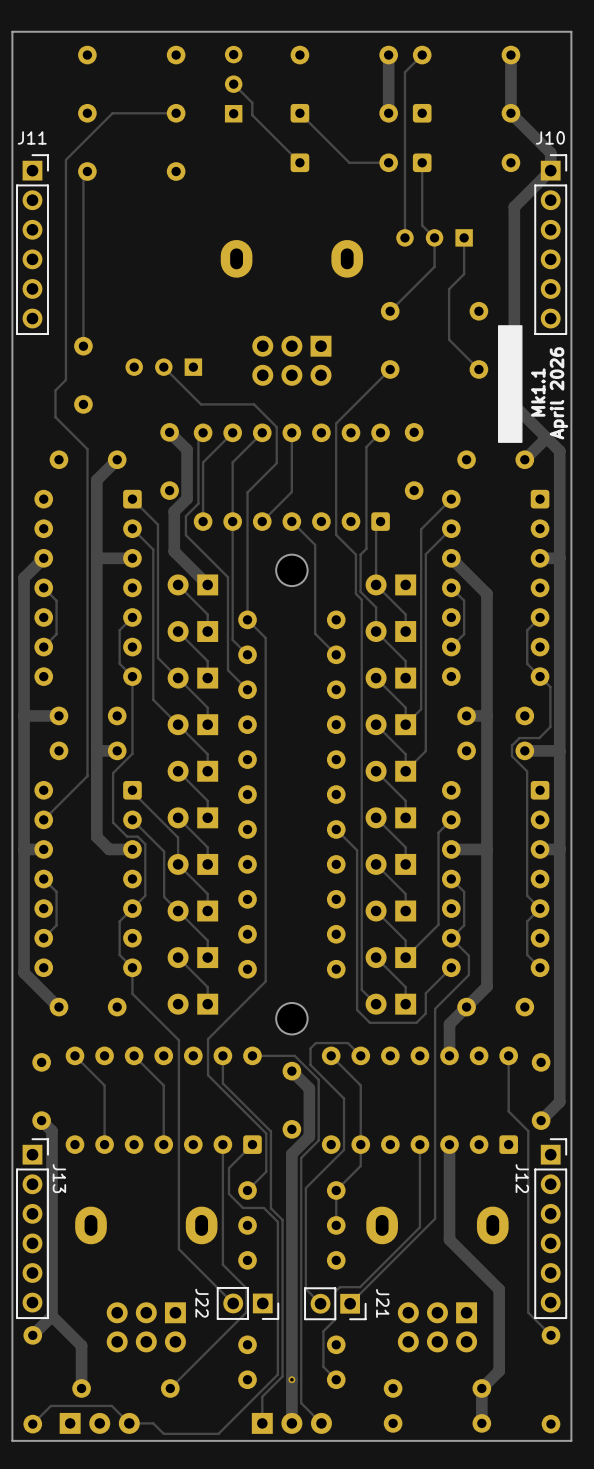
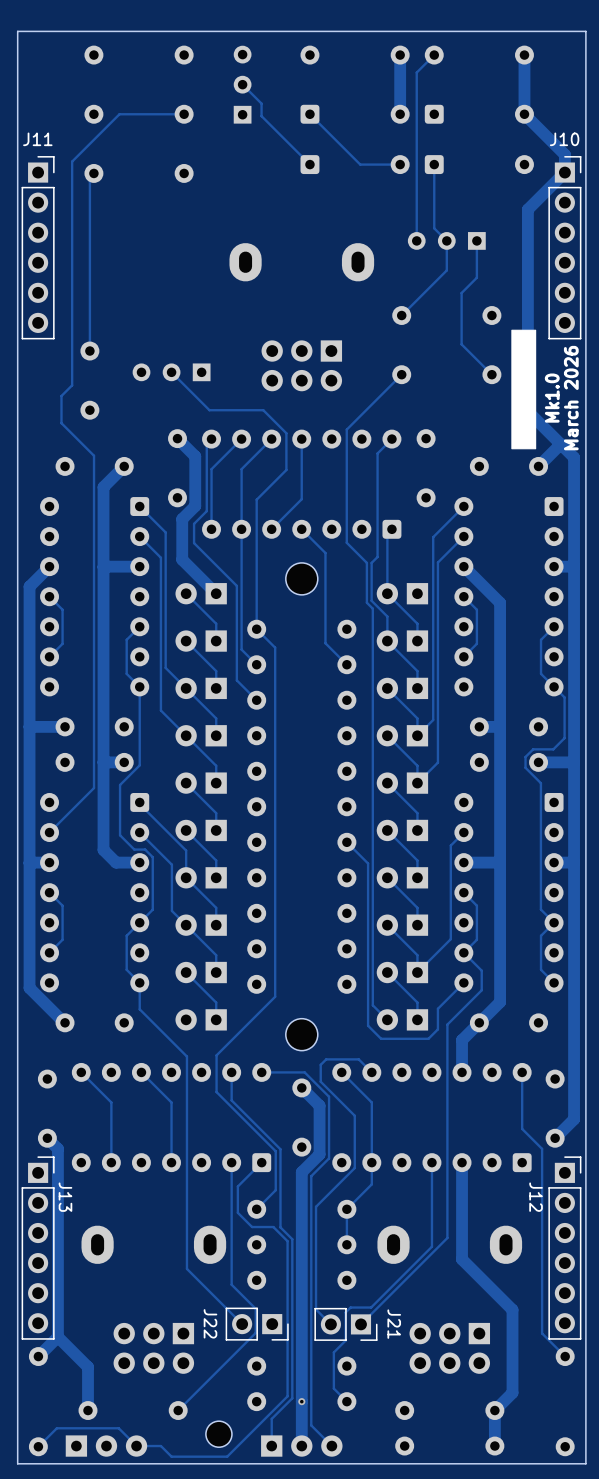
text: Mk1.1 (538, 392) -> Mk1.0 (552, 398)
text: April 2026 (558, 393) -> March 2026 (571, 398)
part: none -> (218, 1434)

